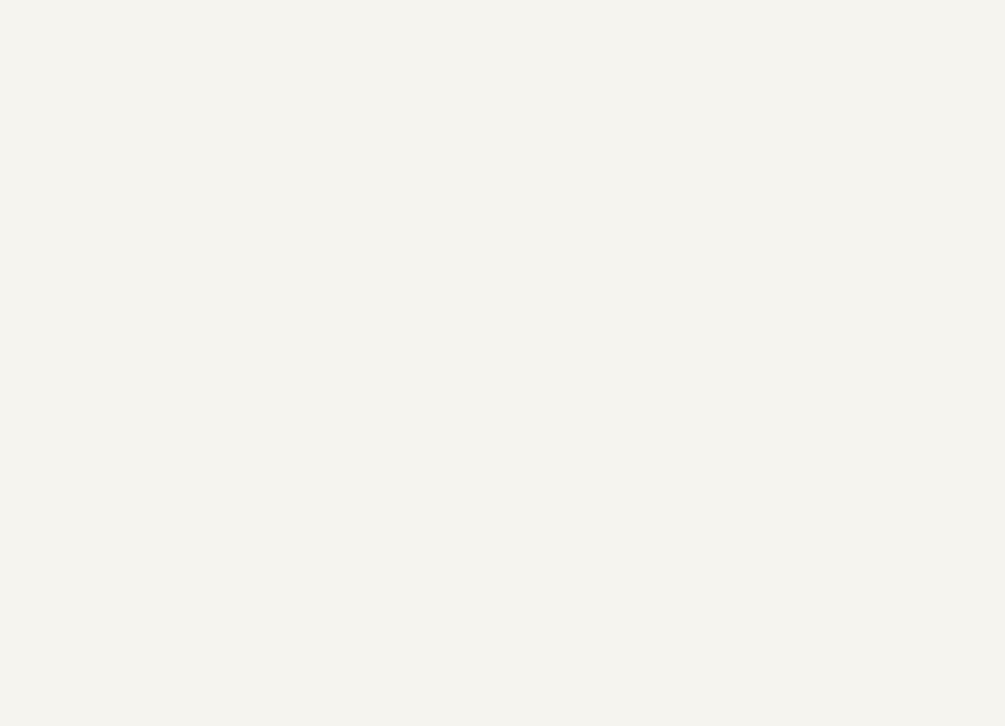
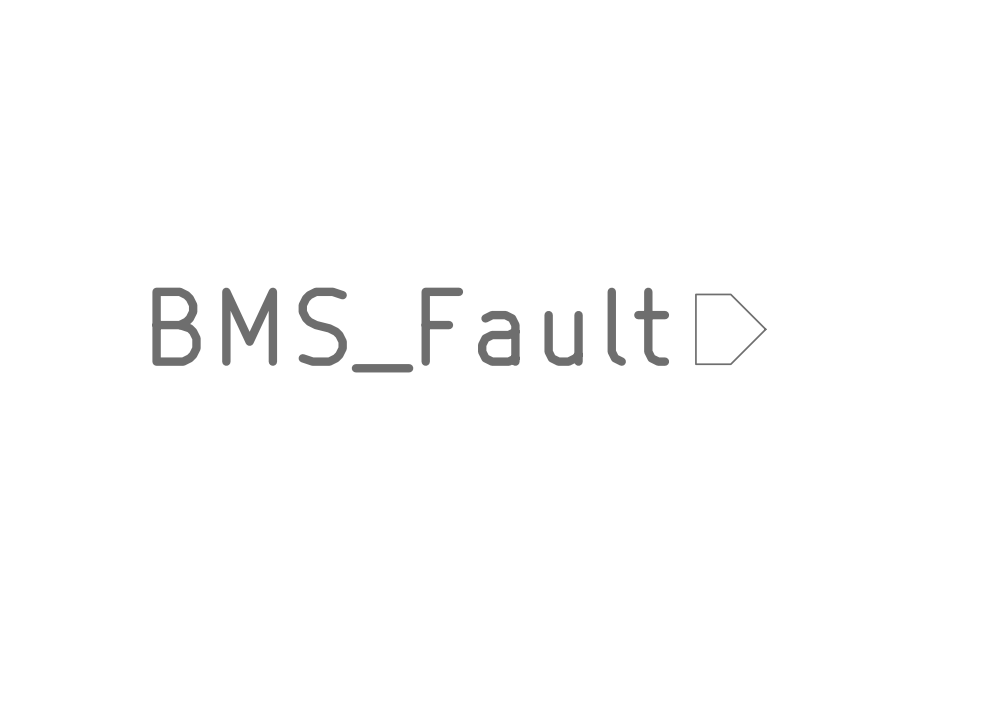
hierarchical label: none -> BMS_Fault (410, 330)

